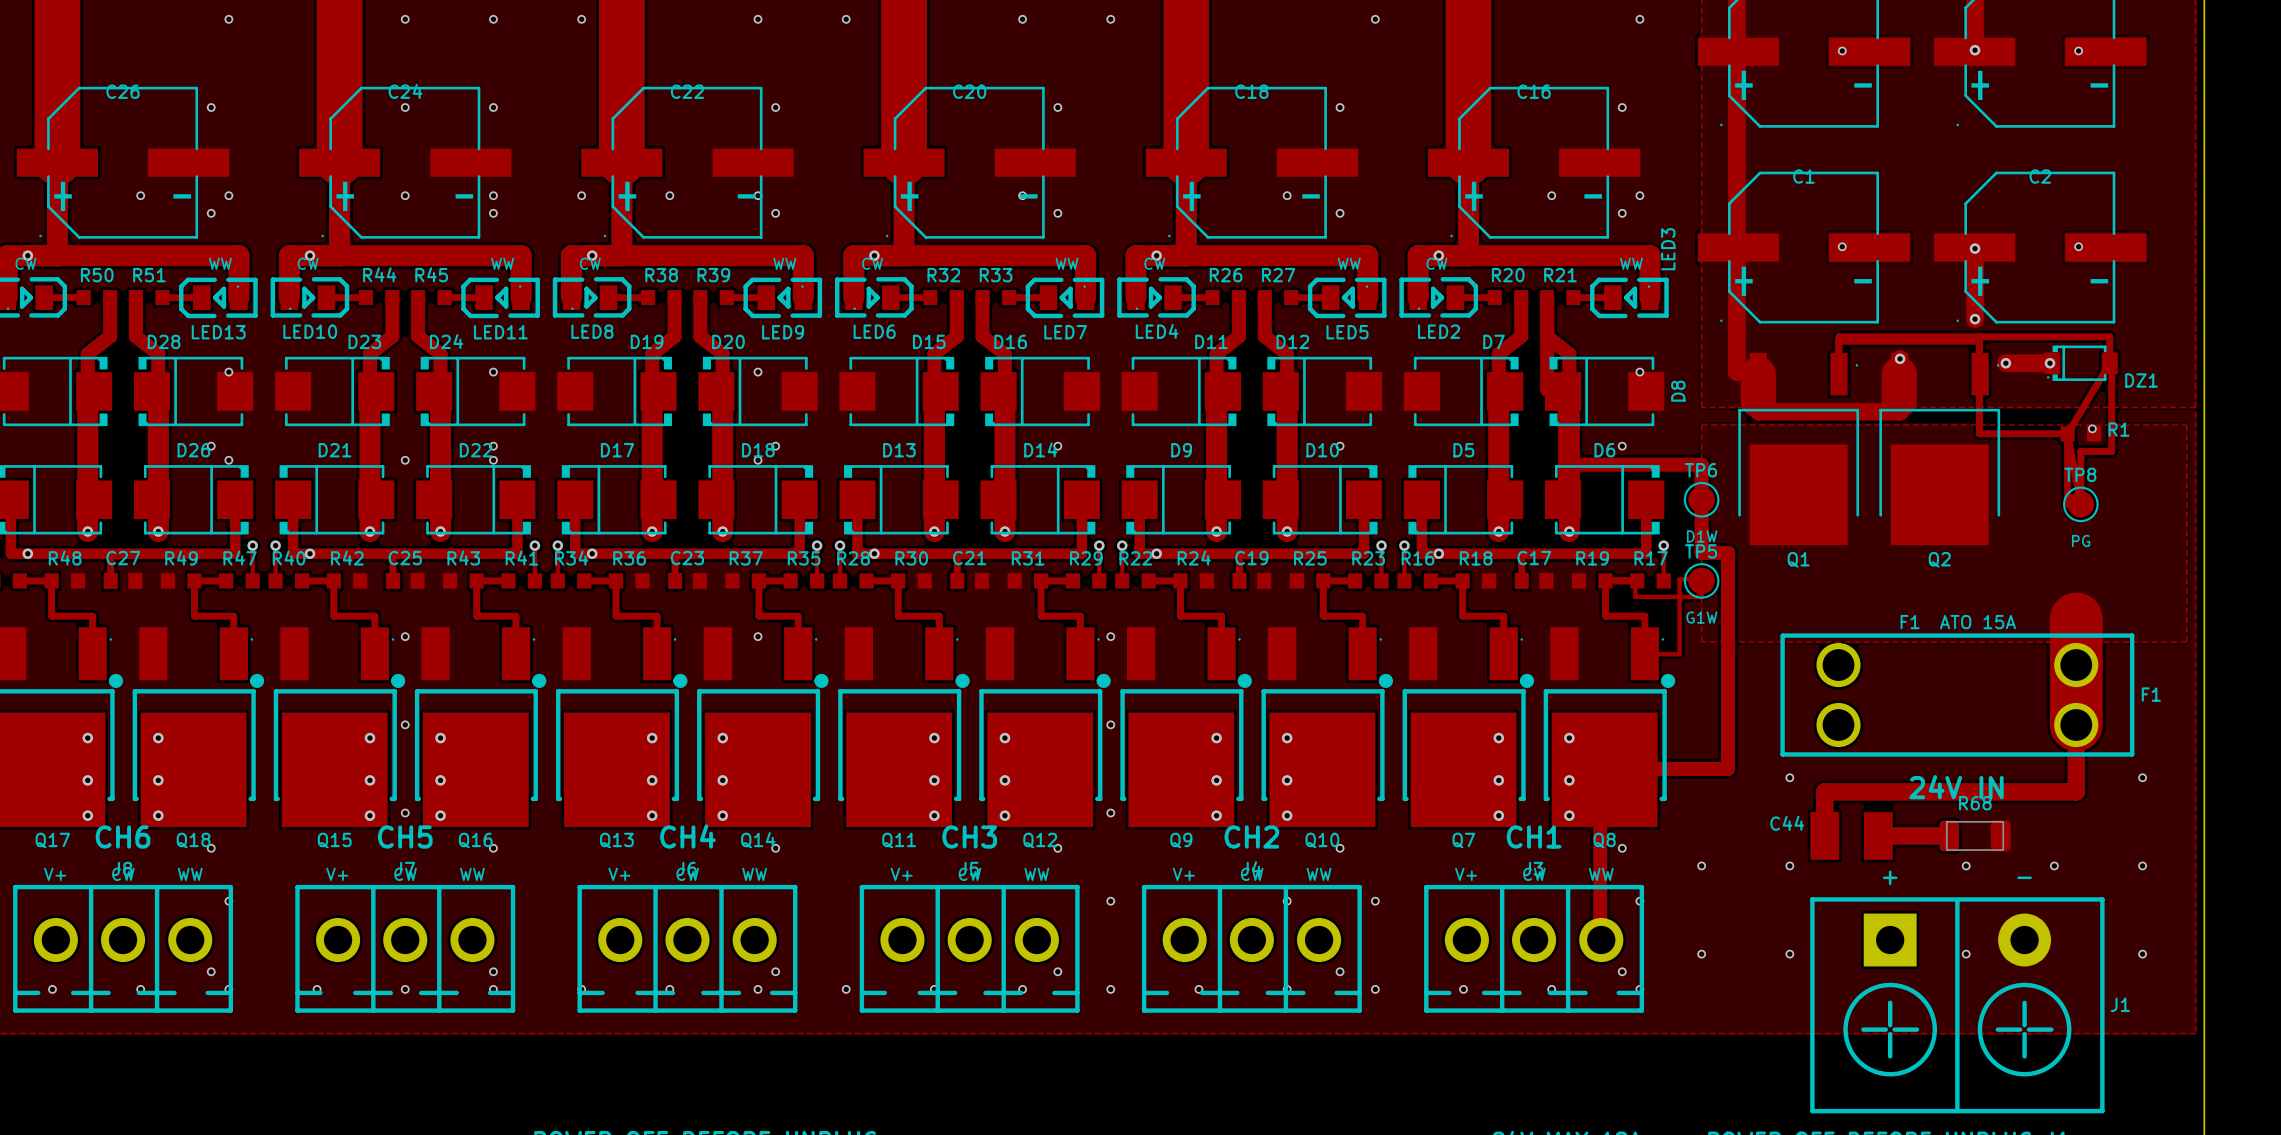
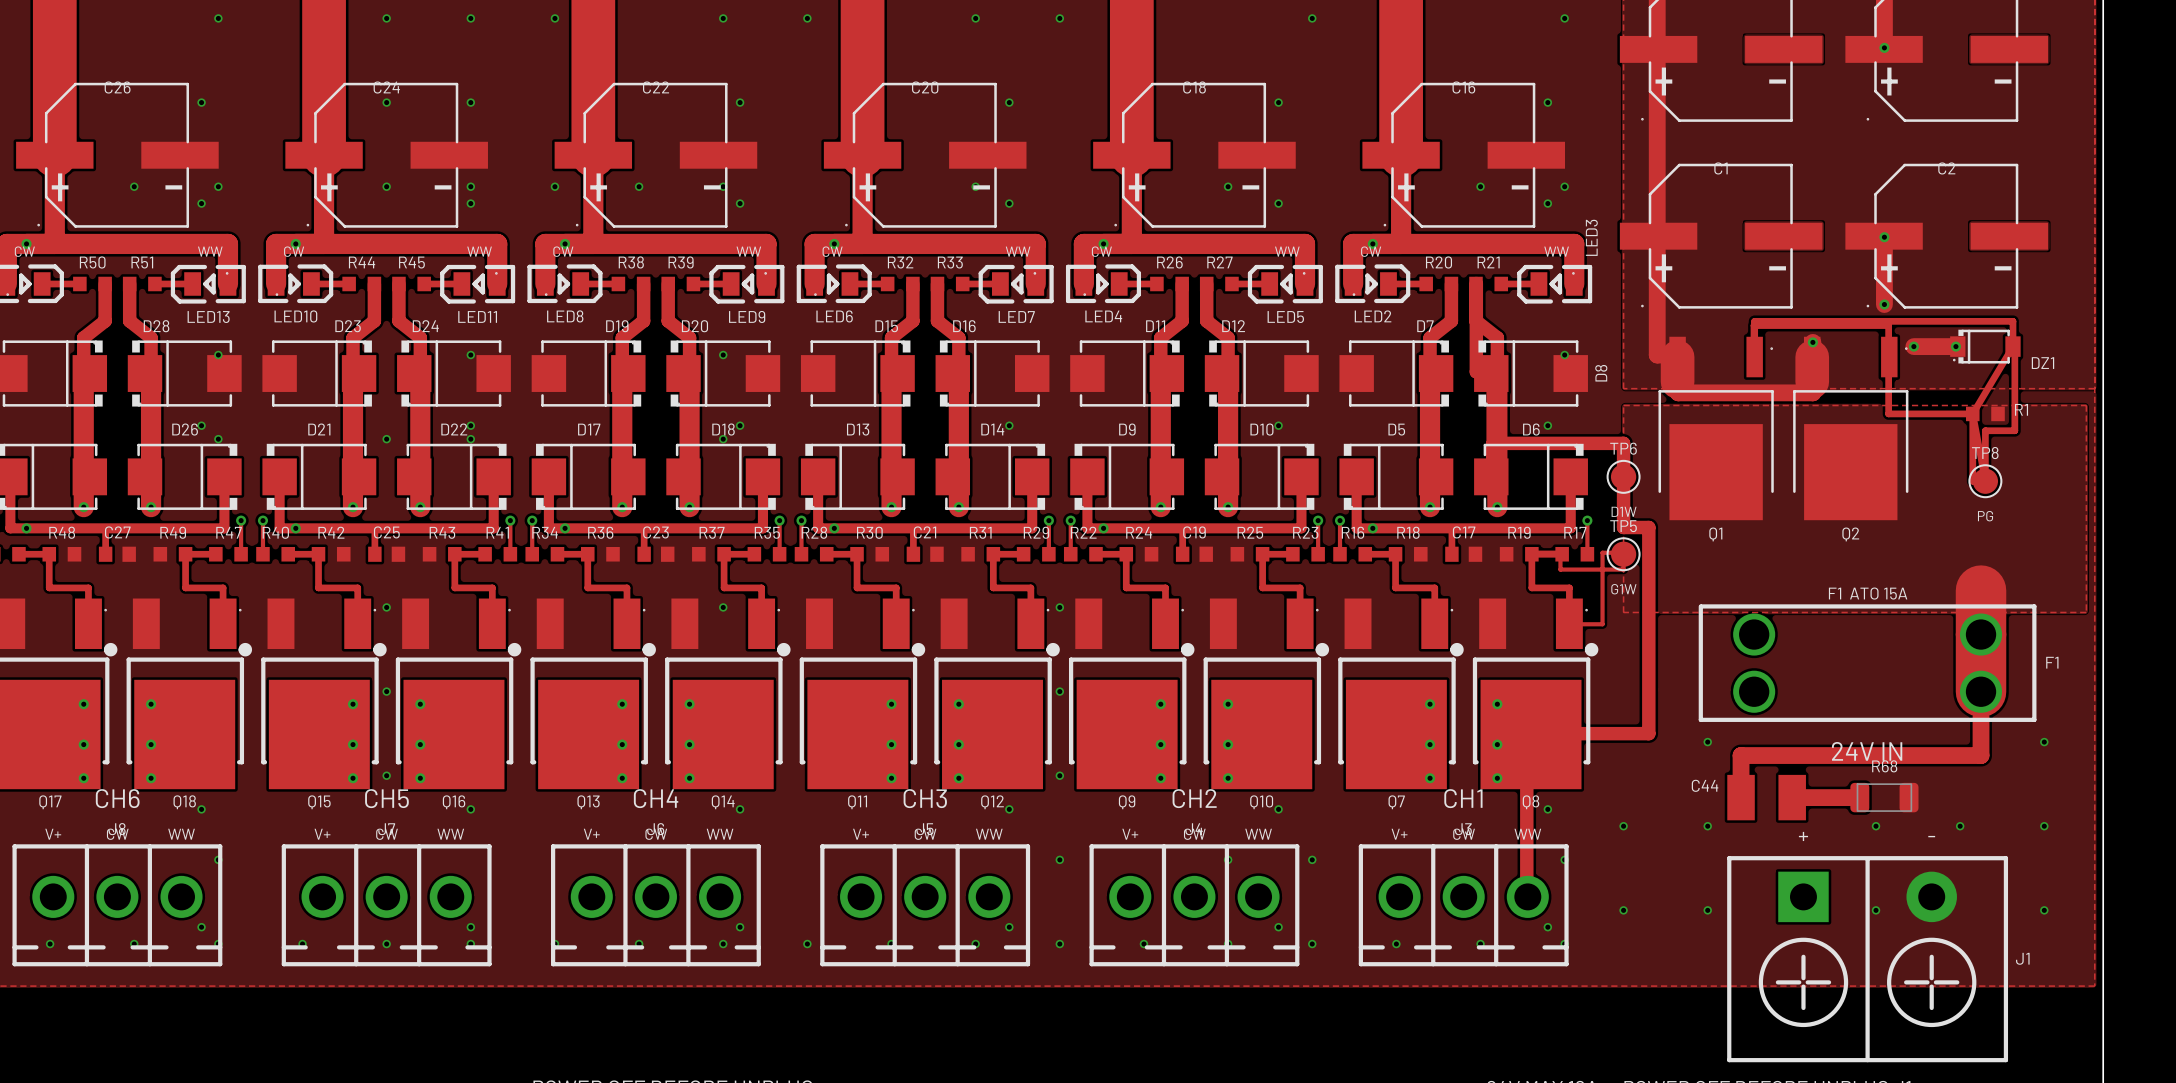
via: (1842, 50) -> none
via: (2078, 50) -> none
via: (1842, 246) -> none
via: (2078, 246) -> none
via: (2092, 428) -> none

